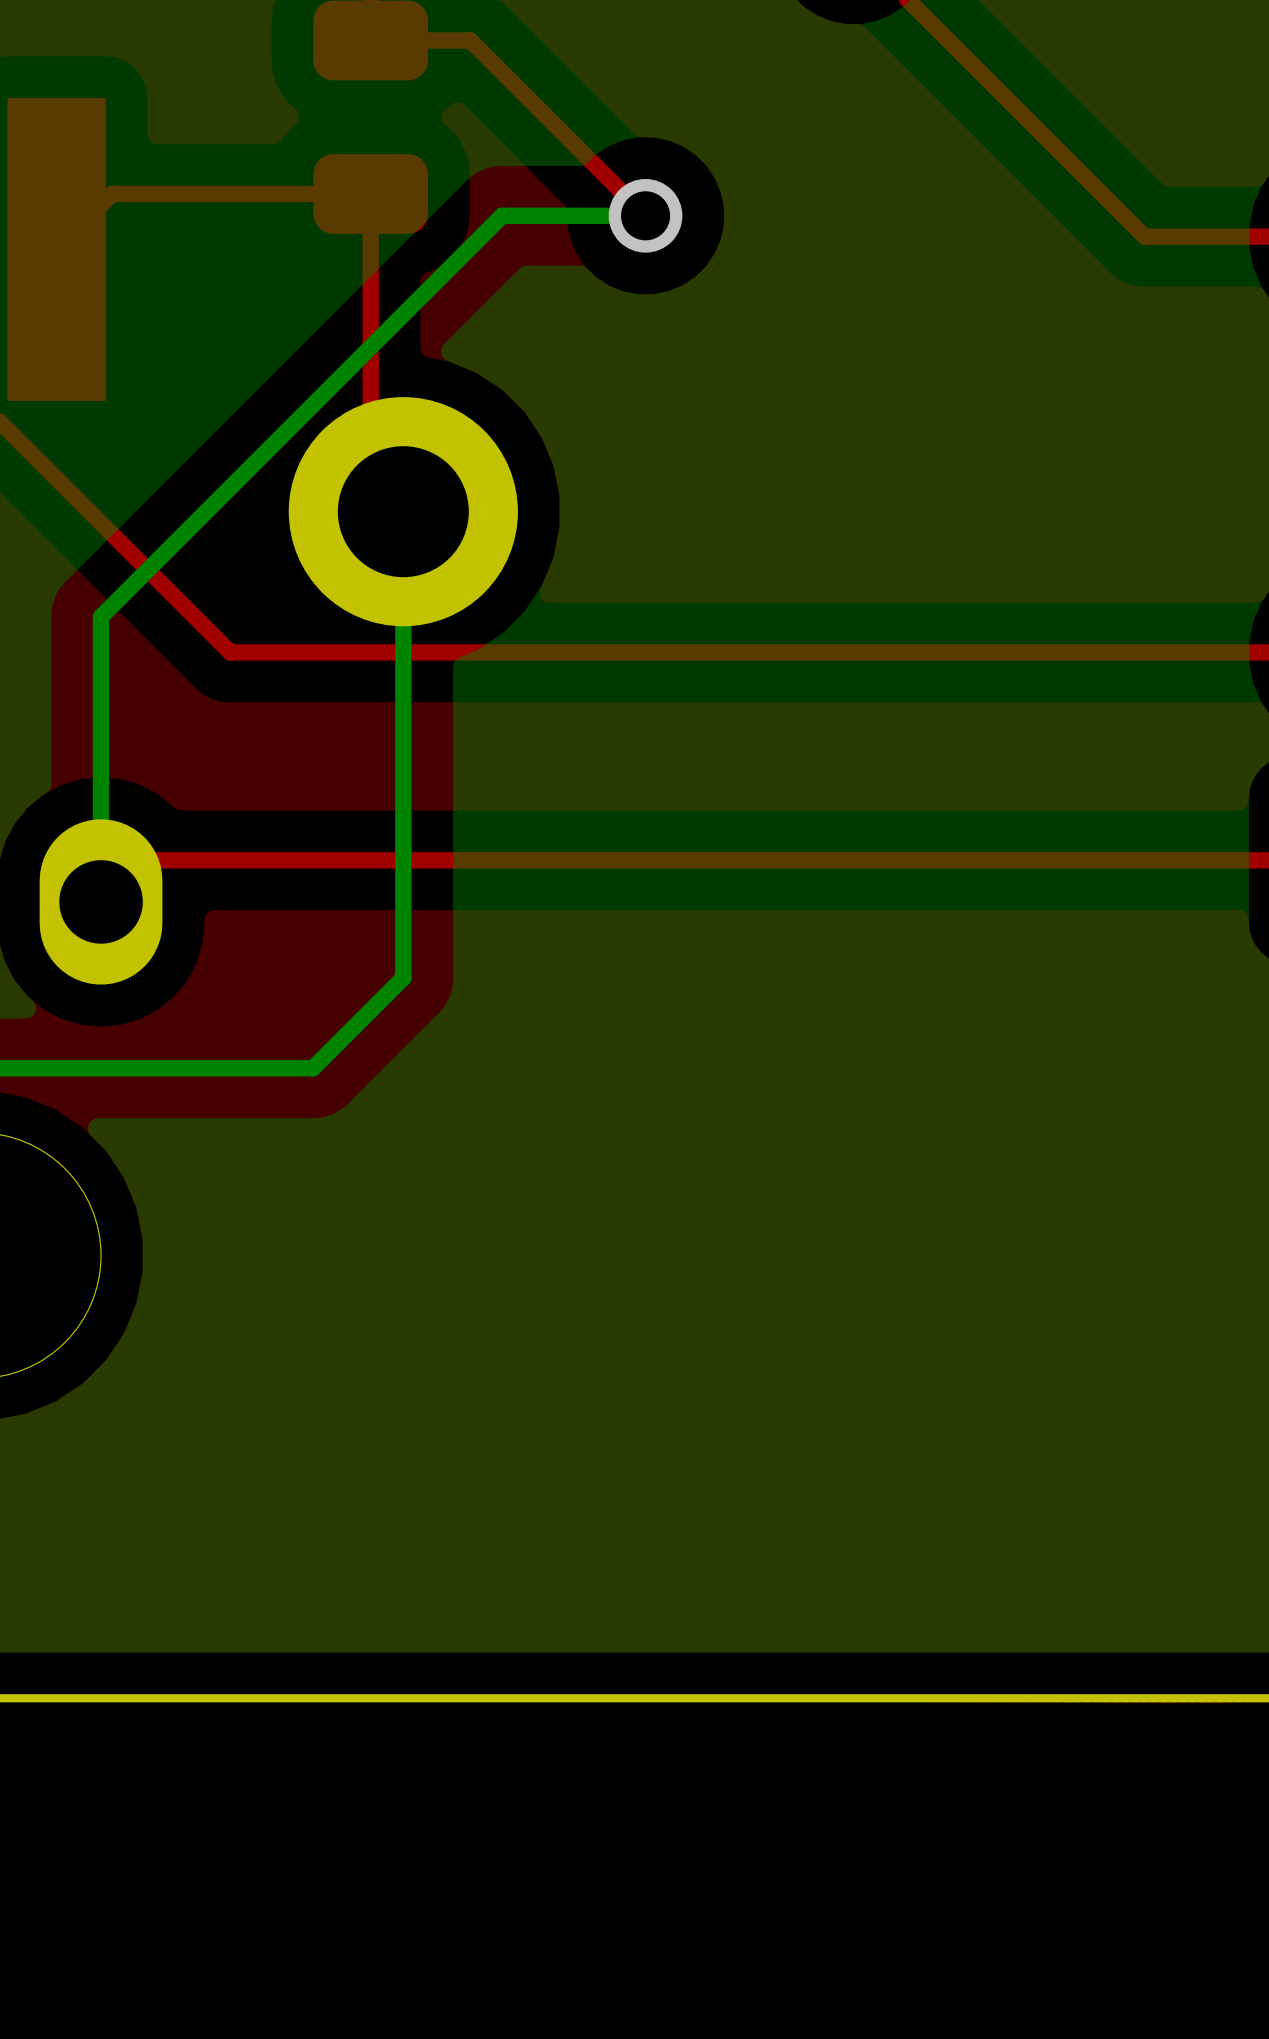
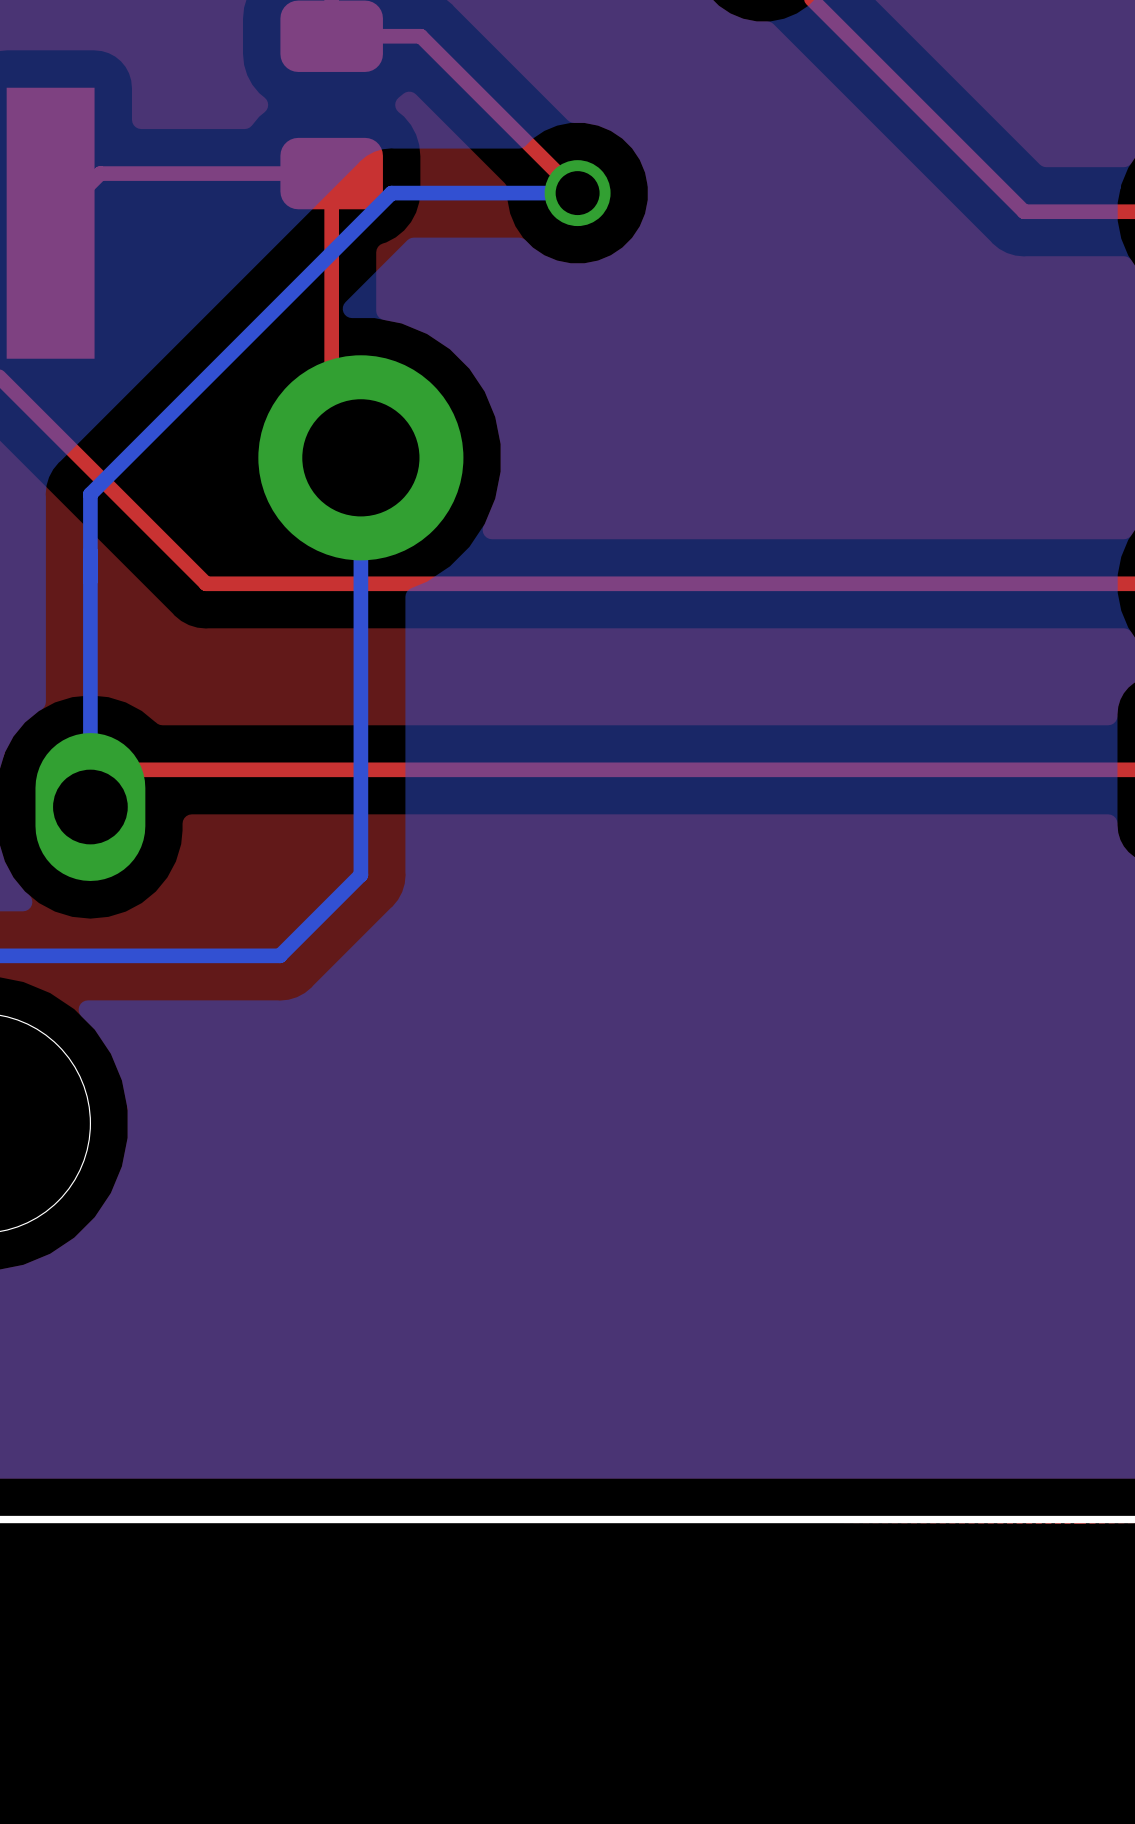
bottom track: (502, 215) (101, 616) -> (449, 193) (391, 193) (90, 494) (90, 551)

